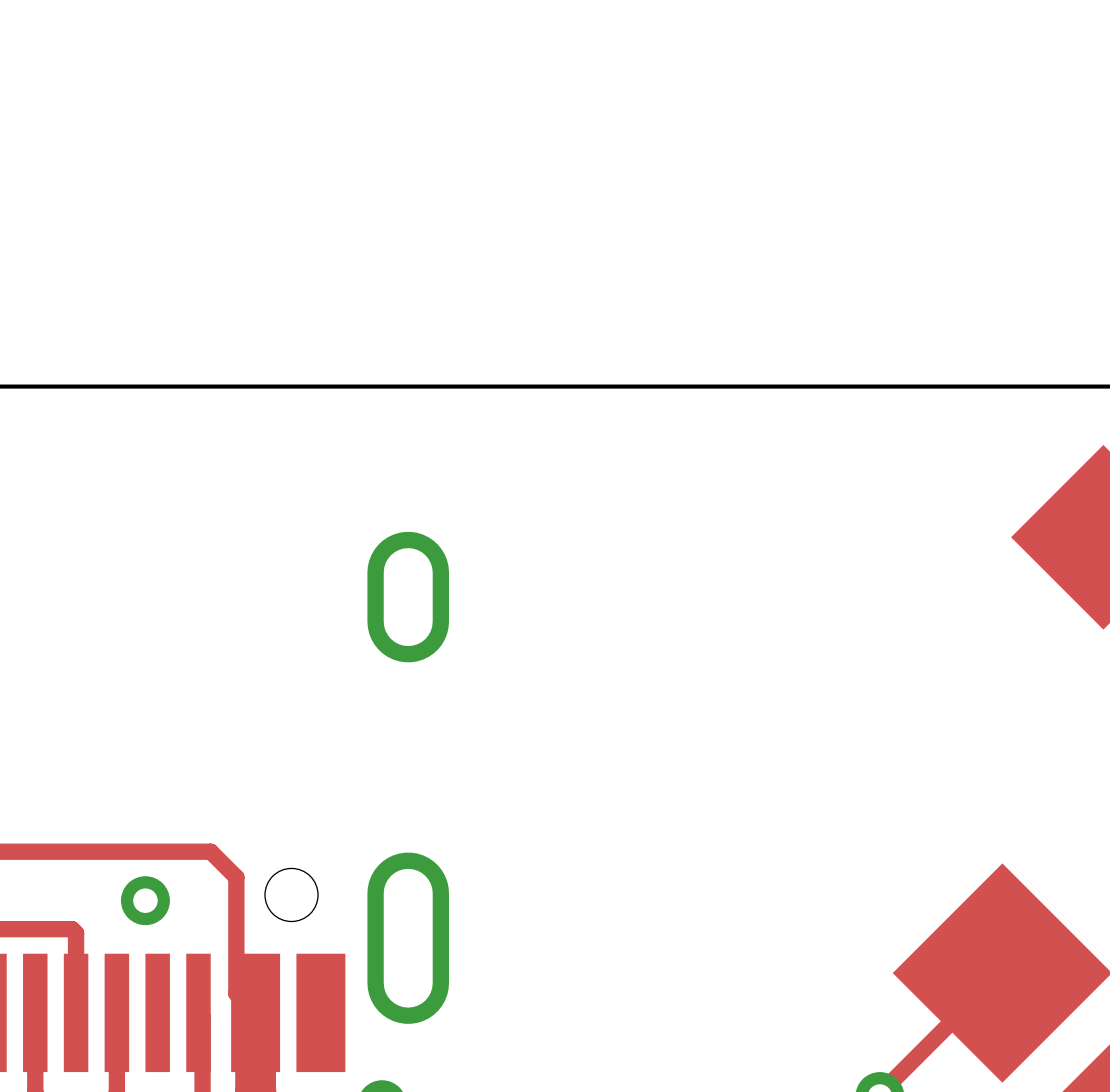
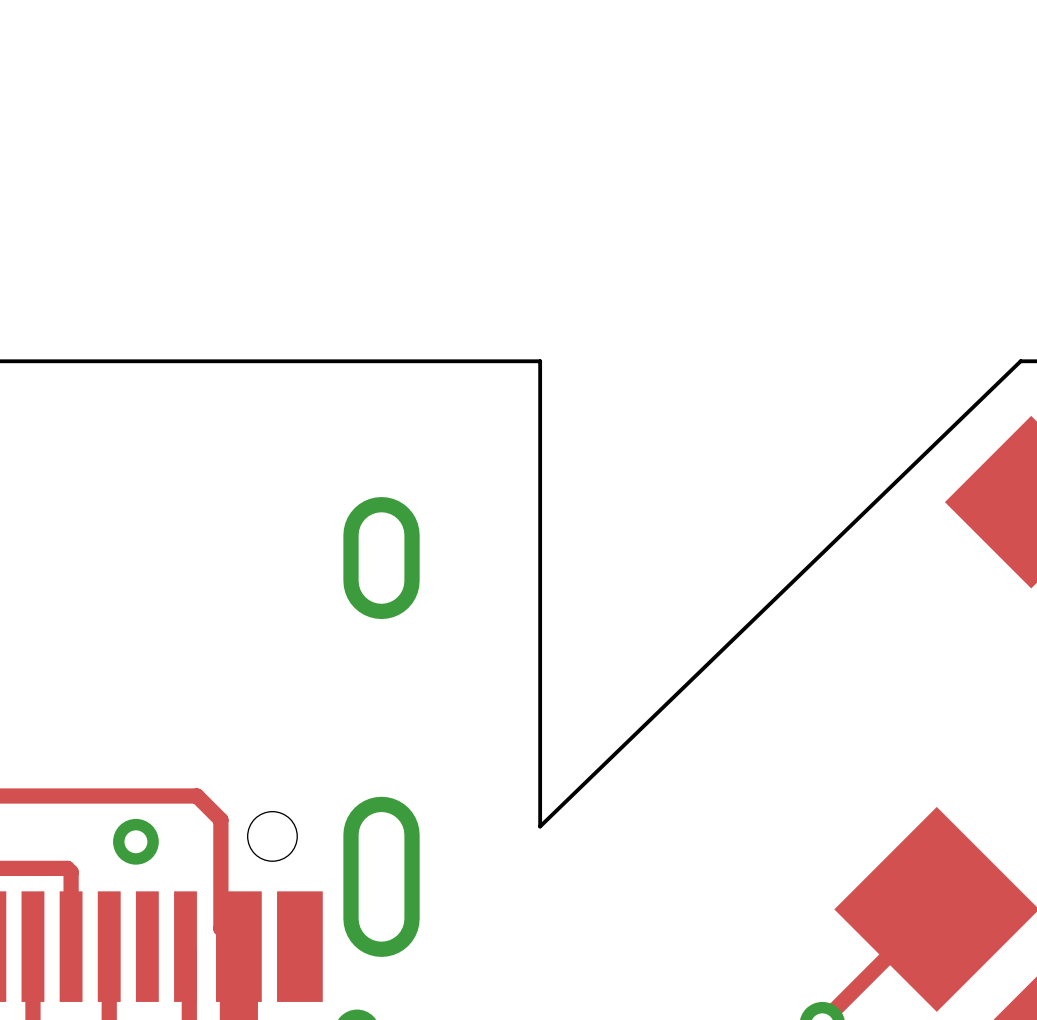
board edge: (1092, 386) (577, 386) -> (1020, 361) (540, 826) (540, 361)

